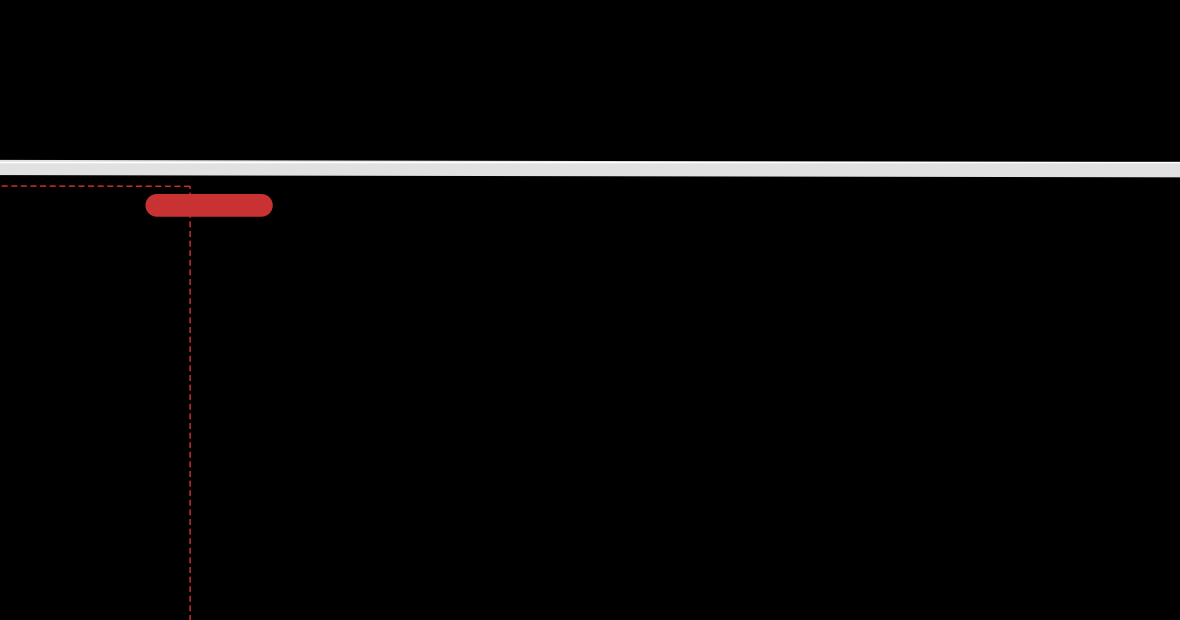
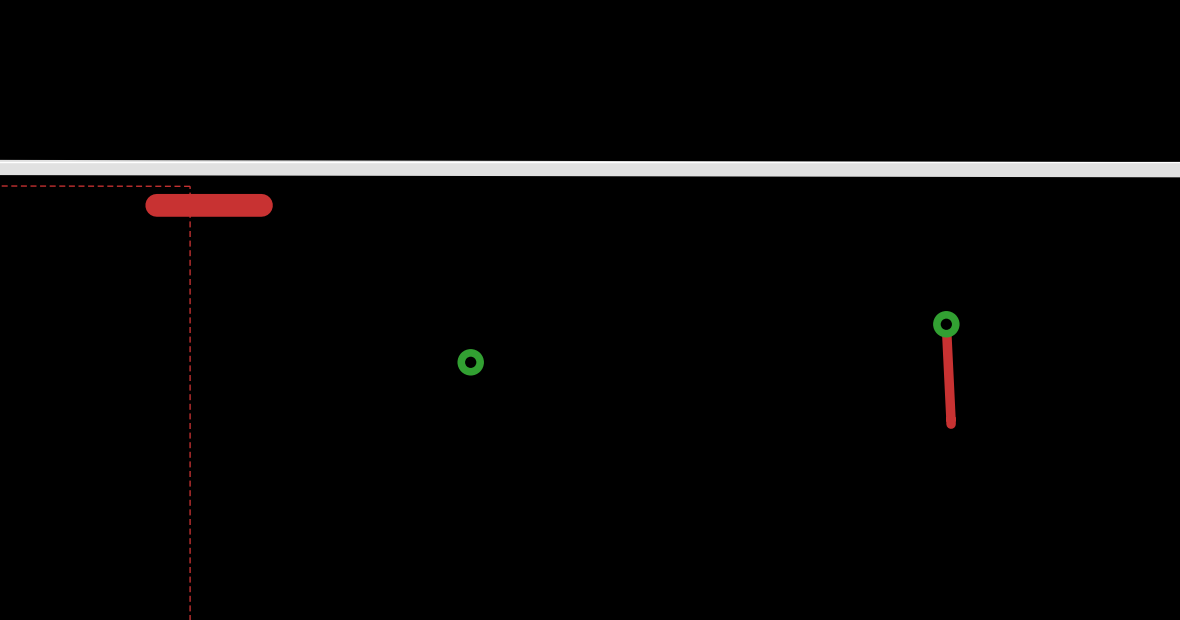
track: none -> (946, 324) (951, 424)
via: none -> (946, 324)
via: none -> (470, 362)

